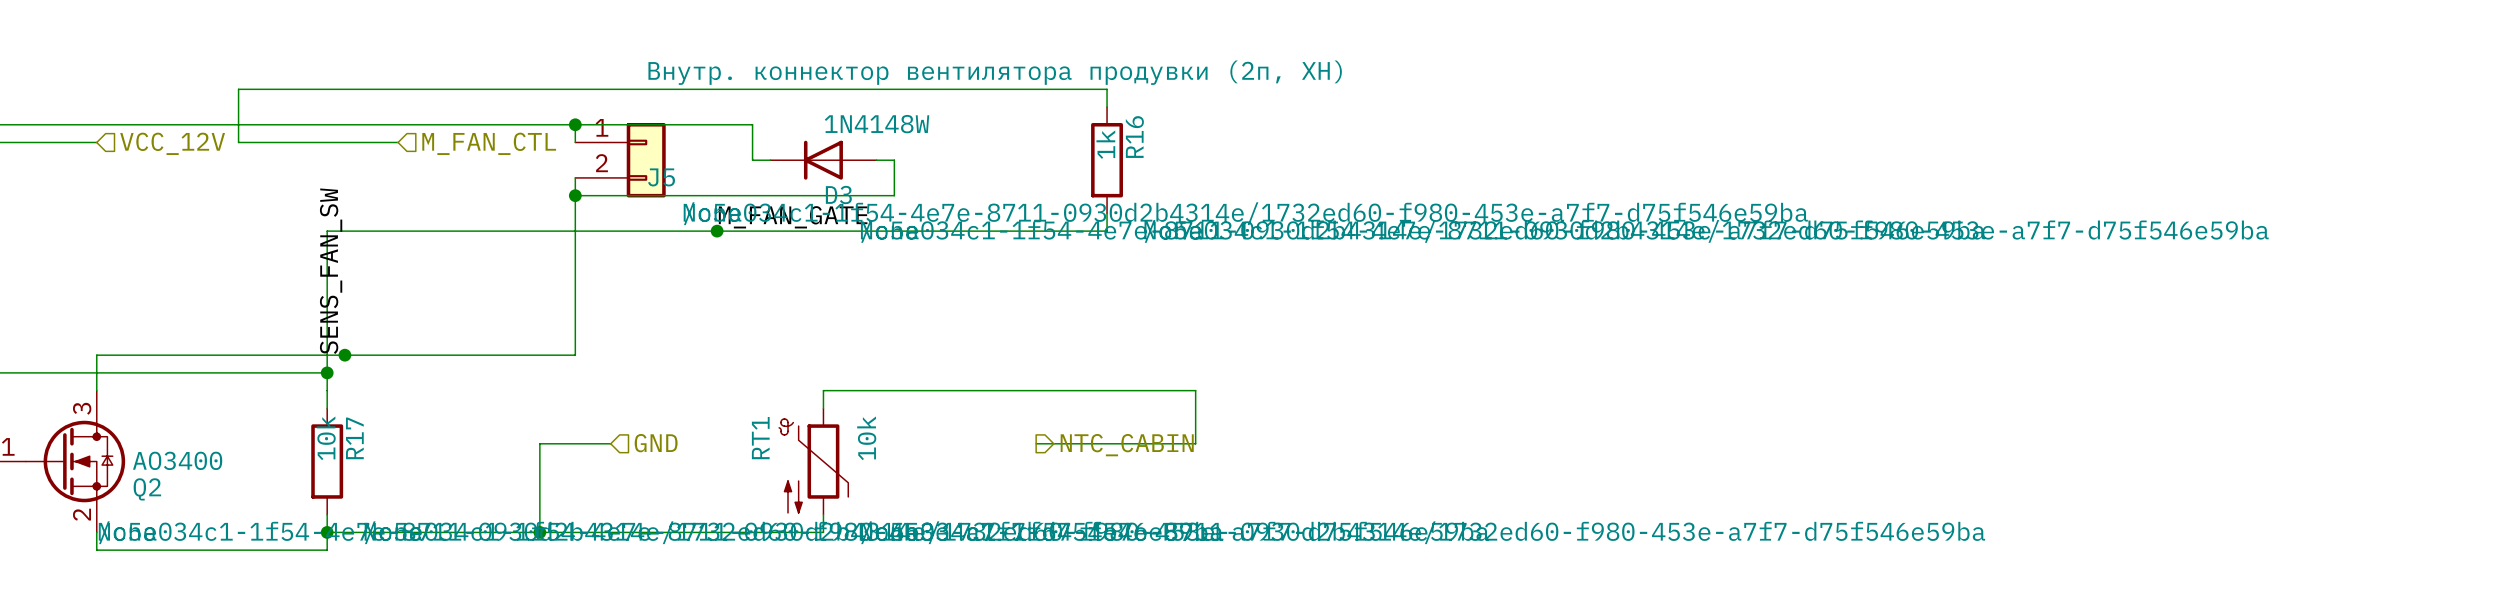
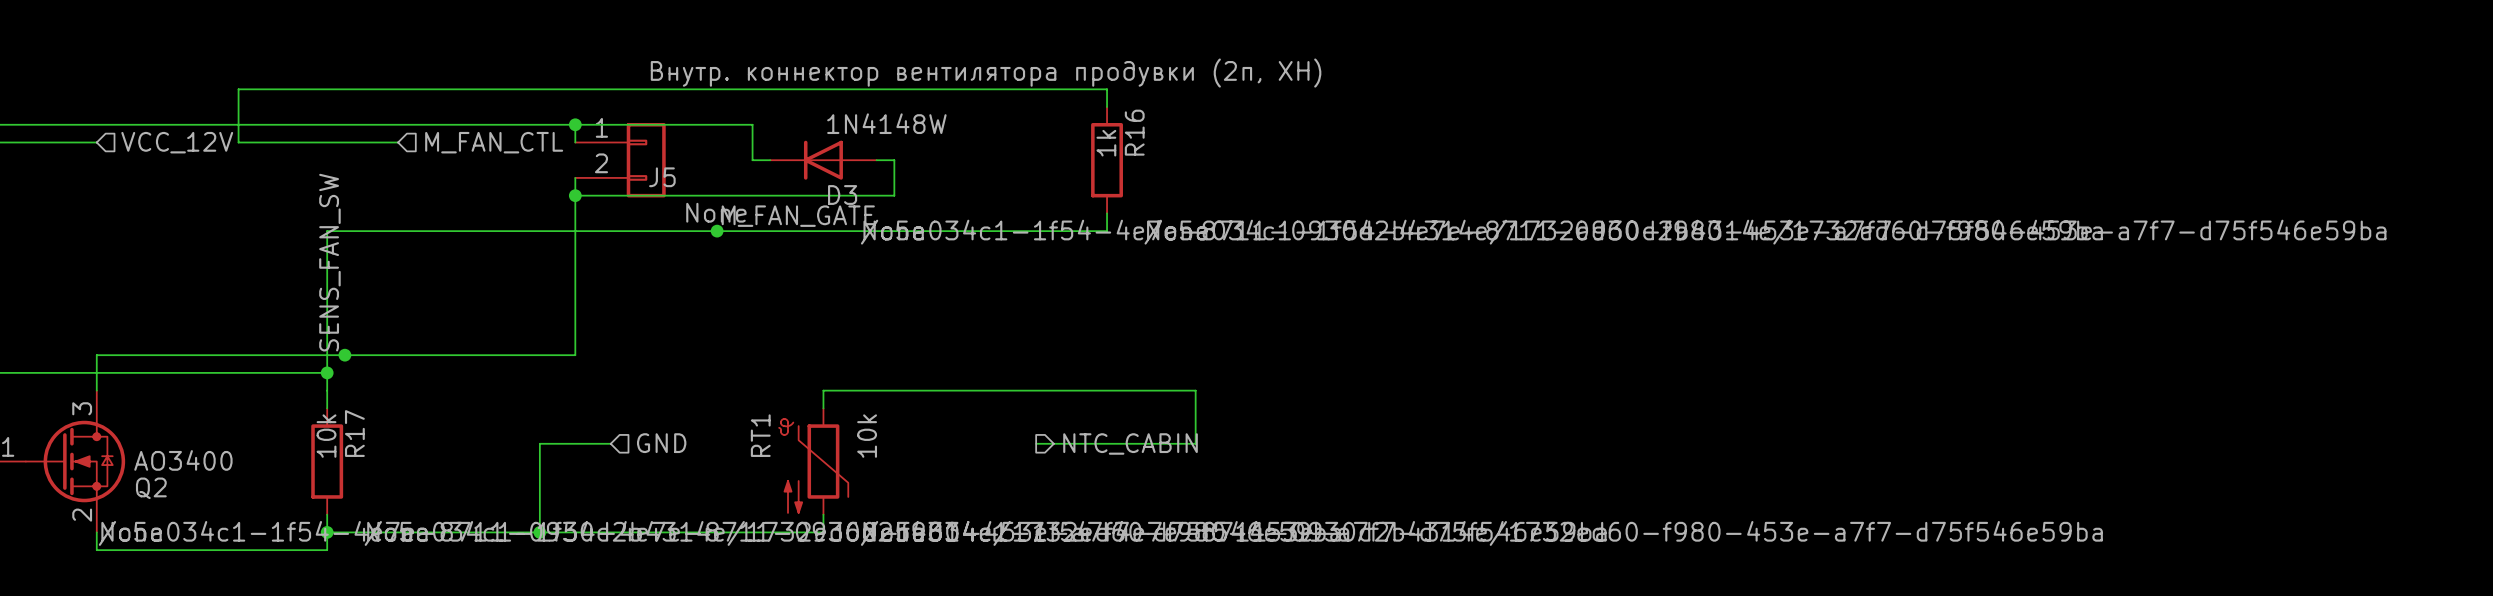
J5 text: /c5a034c1-1f54-4e7e-8711-0930d2b4314e/1732ed60-f980-453e-a7f7-d75f546e59ba (1245, 213) -> none

